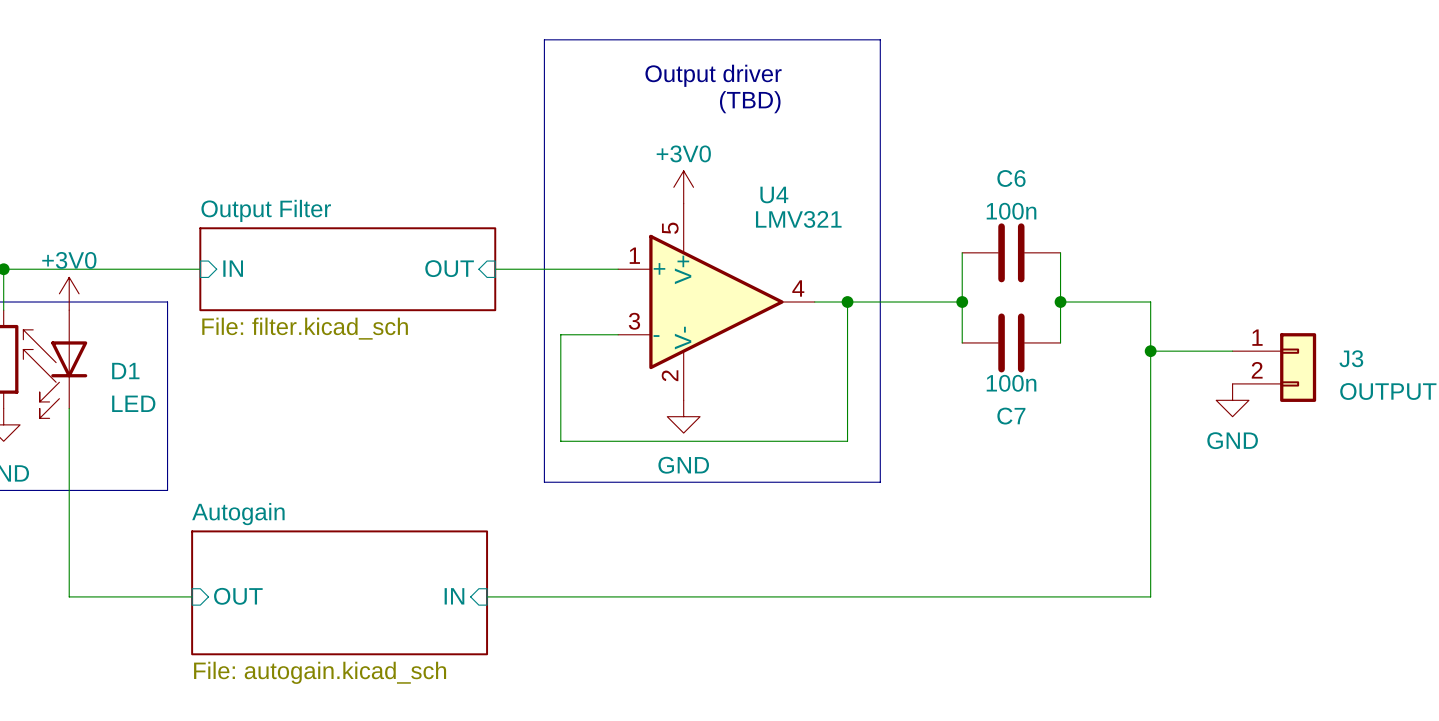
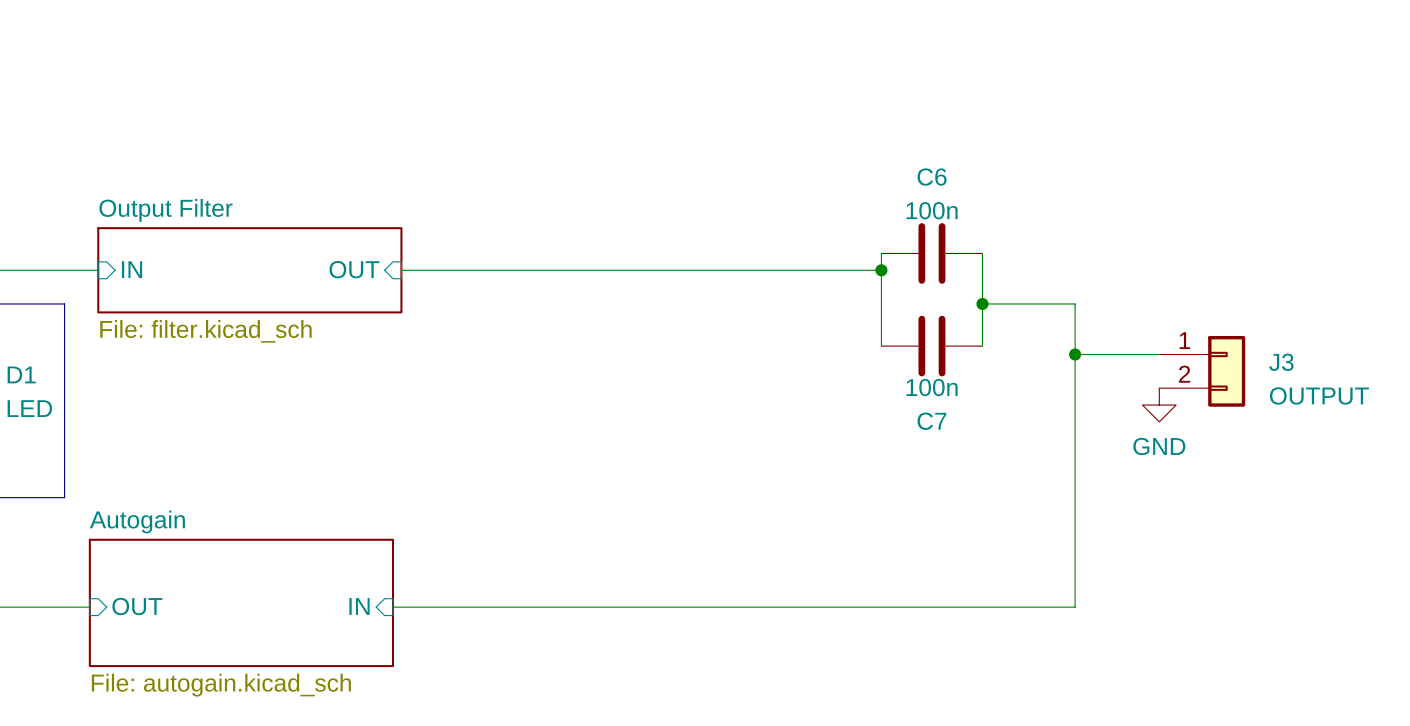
line: (544, 39) (880, 39) (880, 482) (544, 482) (544, 39) -> none
text: Output driver (713, 75) -> none
text: (TBD) (750, 102) -> none
power symbol: +3V0 (683, 187) -> none
wire: none -> (527, 270) (881, 270)
U4: LMV321 (716, 302) -> none
wire: (814, 302) (962, 302) -> none
wire: (847, 302) (847, 441) (560, 441) (560, 334) (618, 334) -> none
junction: (847, 302) -> none
junction position: (962, 302) -> (881, 270)
power symbol: GND (683, 416) -> none

